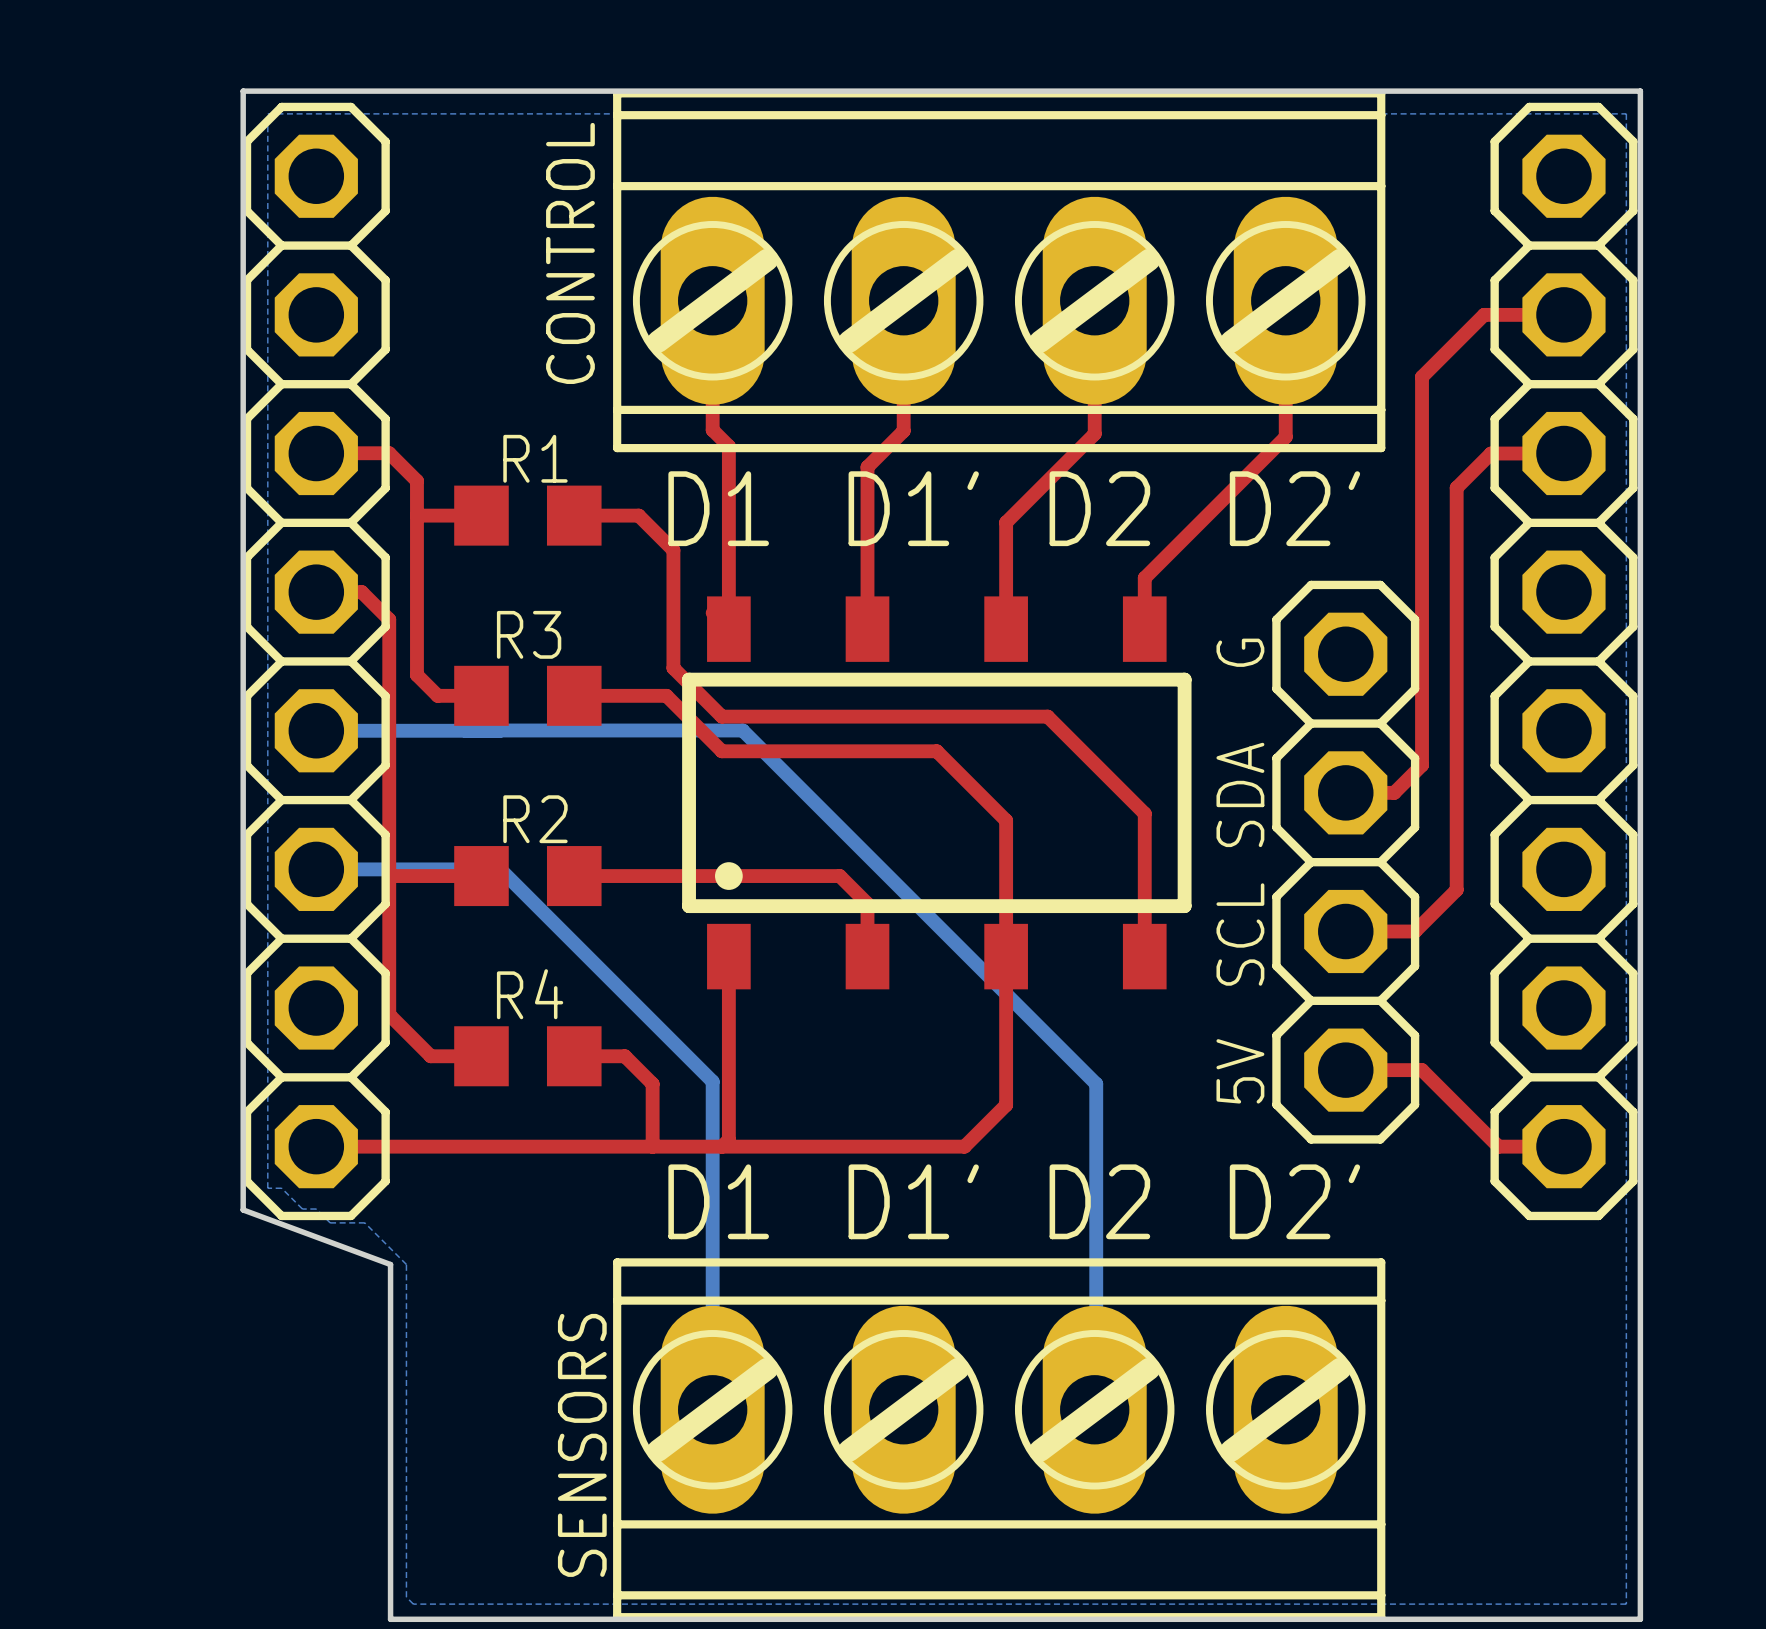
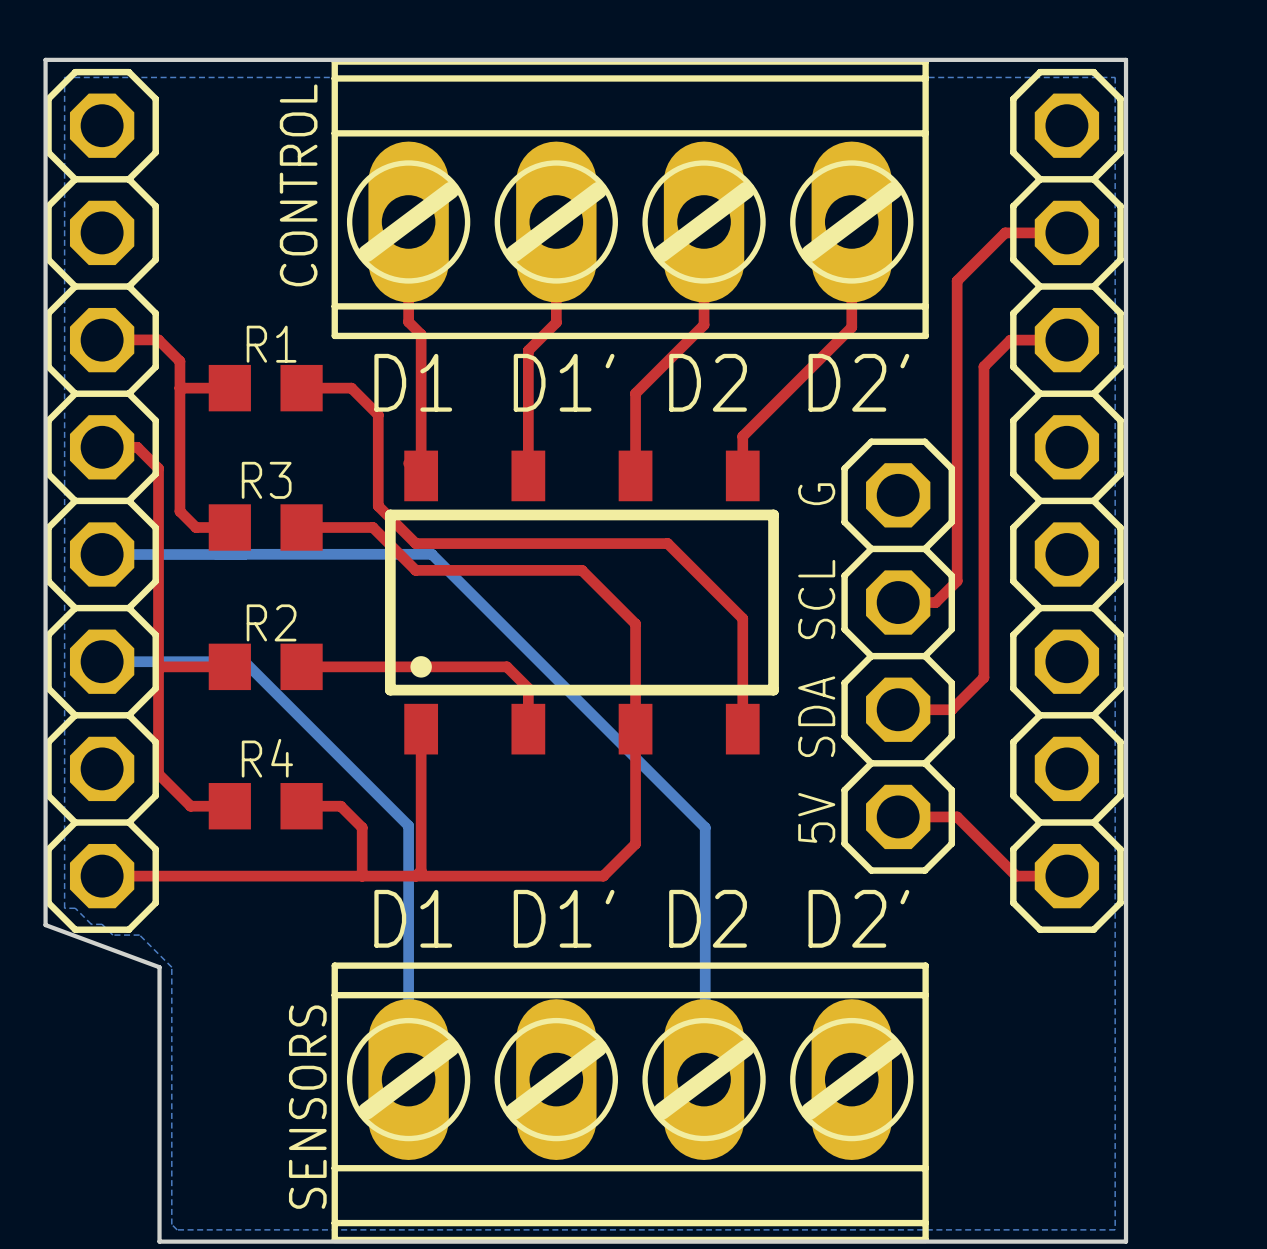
text: SDA (1240, 794) -> SCL (816, 599)
text: SCL (1240, 934) -> SDA (816, 716)

